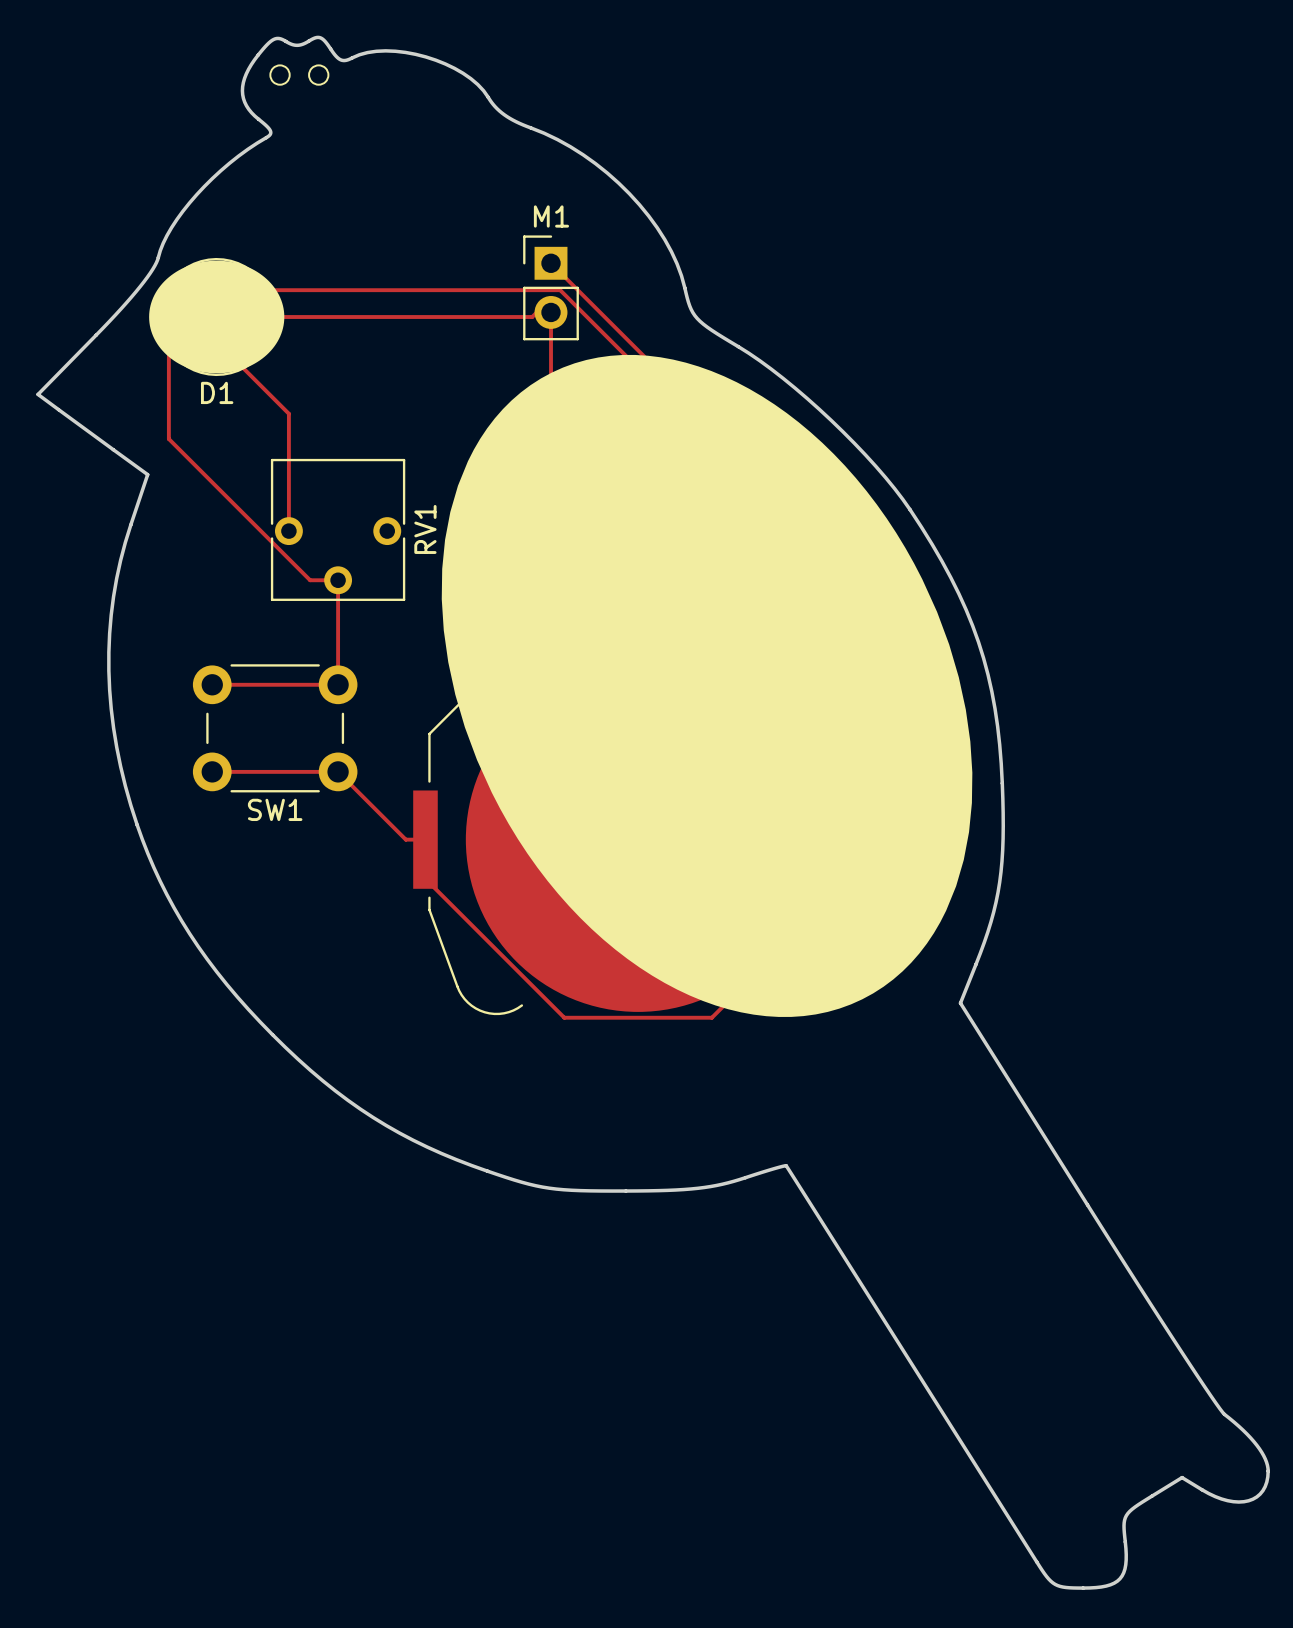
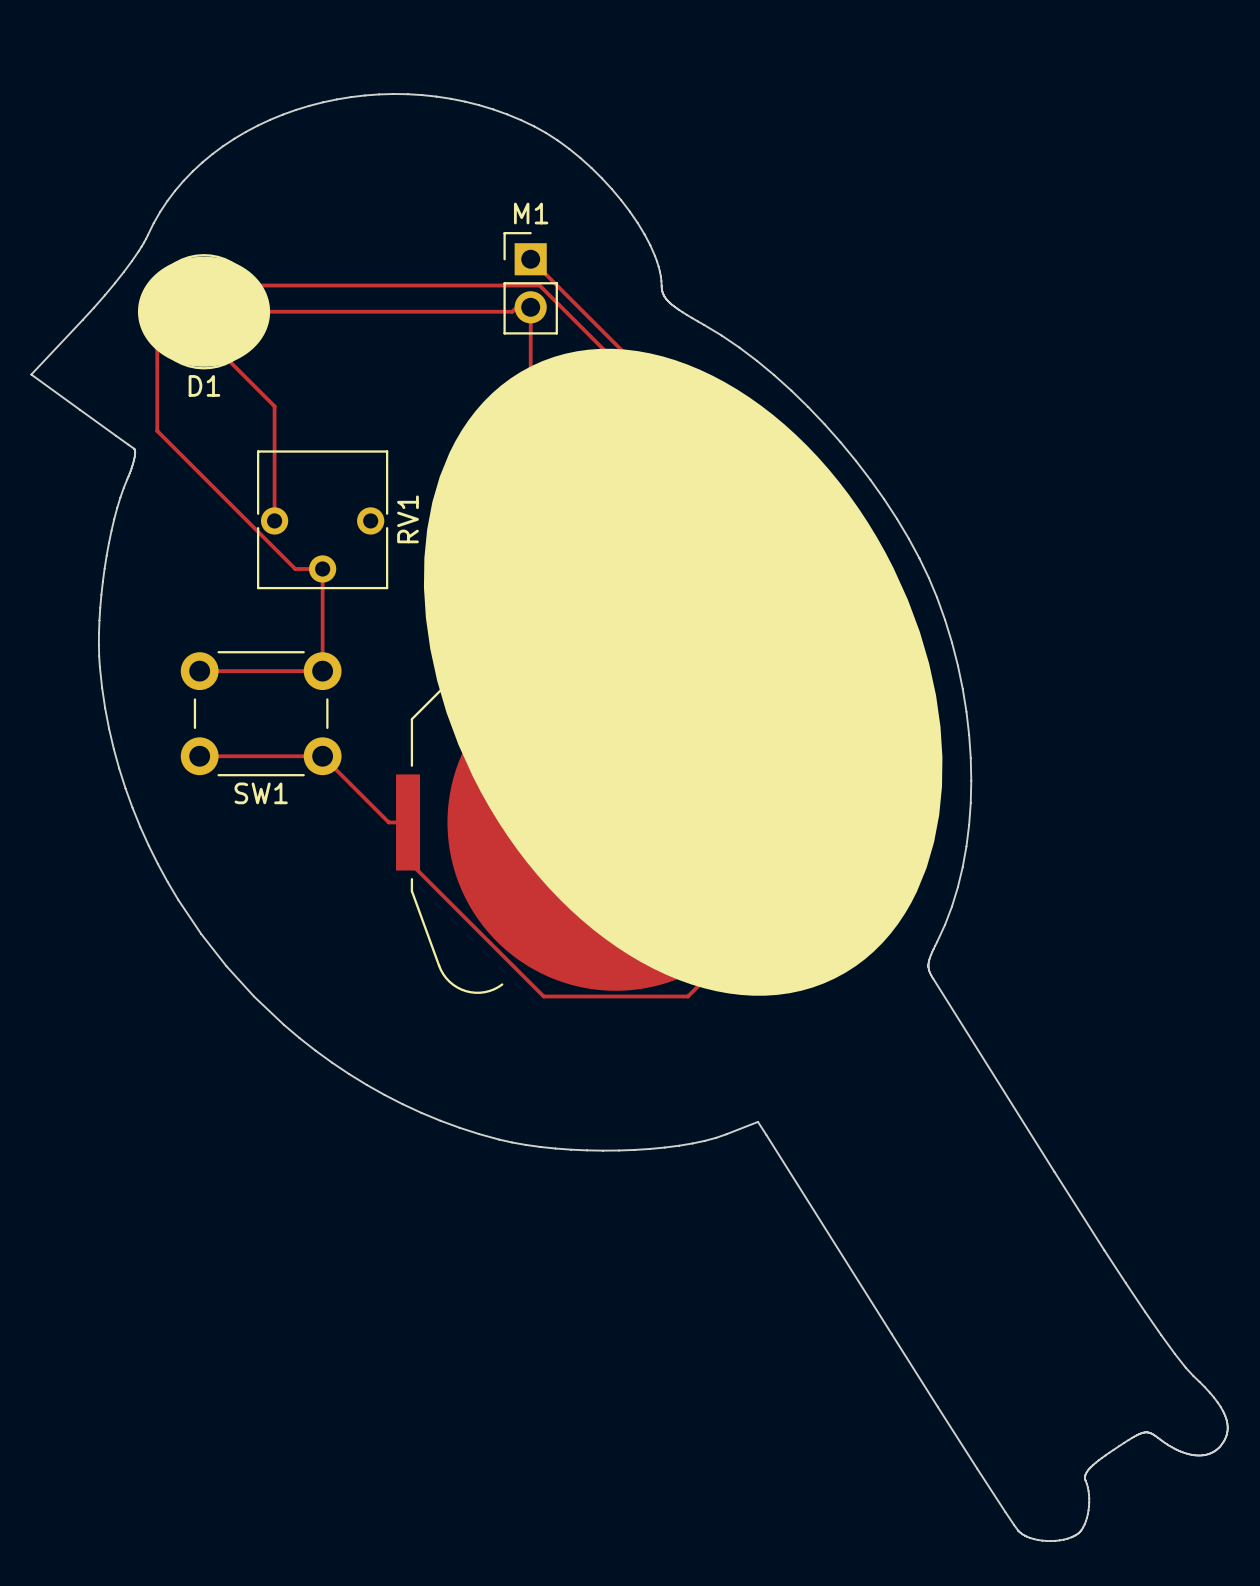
board edge: (308, 41) (316, 37) (321, 38) (336, 56) (342, 60) (367, 52) (385, 50) (415, 54) (445, 64) (463, 73) (477, 84) (495, 106) (507, 116) (570, 146) (607, 173) (639, 204) (664, 239) (677, 263) (689, 305) (697, 318) (783, 378) (854, 443) (902, 499) (950, 577) (978, 642) (991, 691) (999, 744) (1003, 812) (1001, 861) (996, 902) (984, 942) (960, 1003) (1189, 1363) (1222, 1412) (1256, 1445) (1265, 1459) (1267, 1468) (1266, 1482) (1262, 1490) (1256, 1496) (1248, 1500) (1233, 1501) (1221, 1498) (1182, 1477) (1134, 1507) (1127, 1513) (1124, 1520) (1124, 1568) (1119, 1578) (1114, 1583) (1095, 1587) (1066, 1587) (1055, 1584) (1046, 1576) (786, 1165) (728, 1182) (697, 1188) (658, 1190) (580, 1190) (528, 1184) (441, 1153) (399, 1133) (360, 1109) (322, 1080) (285, 1047) (248, 1009) (216, 971) (189, 933) (166, 894) (142, 839) (125, 785) (116, 747) (109, 689) (109, 633) (116, 578) (125, 542) (147, 474) (38, 394) (109, 321) (140, 286) (154, 265) (171, 227) (196, 194) (229, 163) (270, 134) (269, 128) (248, 109) (242, 94) (244, 78) (258, 54) (275, 38) (281, 38) (295, 45) (308, 41) -> none
drawing: [269, 64, 330, 86] -> none
board edge: none -> (134, 448) (31, 374) (94, 307) (123, 271) (141, 246) (160, 211) (183, 180) (202, 162) (234, 138) (270, 119) (322, 102) (379, 94) (422, 95) (479, 105) (520, 120) (557, 140) (591, 167) (621, 200) (644, 234) (657, 261) (662, 291) (666, 299) (678, 309) (721, 335) (756, 360) (808, 407) (840, 442) (870, 479) (896, 518) (919, 558) (937, 597) (952, 642) (962, 688) (970, 757) (969, 825) (962, 867) (951, 906) (930, 957) (929, 971) (1125, 1283) (1174, 1353) (1220, 1407) (1225, 1417) (1227, 1427) (1225, 1437) (1219, 1446) (1208, 1454) (1193, 1455) (1174, 1448) (1150, 1433) (1138, 1434) (1101, 1457) (1086, 1472) (1084, 1478) (1089, 1494) (1088, 1510) (1084, 1524) (1078, 1532) (1067, 1538) (1055, 1540) (1038, 1540) (1026, 1536) (1018, 1530) (977, 1468) (757, 1121) (705, 1140) (650, 1148) (571, 1149) (512, 1142) (479, 1134) (440, 1120) (384, 1094) (332, 1062) (283, 1024) (254, 996) (226, 966) (201, 933) (178, 899) (157, 864) (140, 826) (125, 788) (113, 748) (105, 708) (99, 667) (100, 607) (111, 530) (120, 497) (133, 463) (134, 449)

